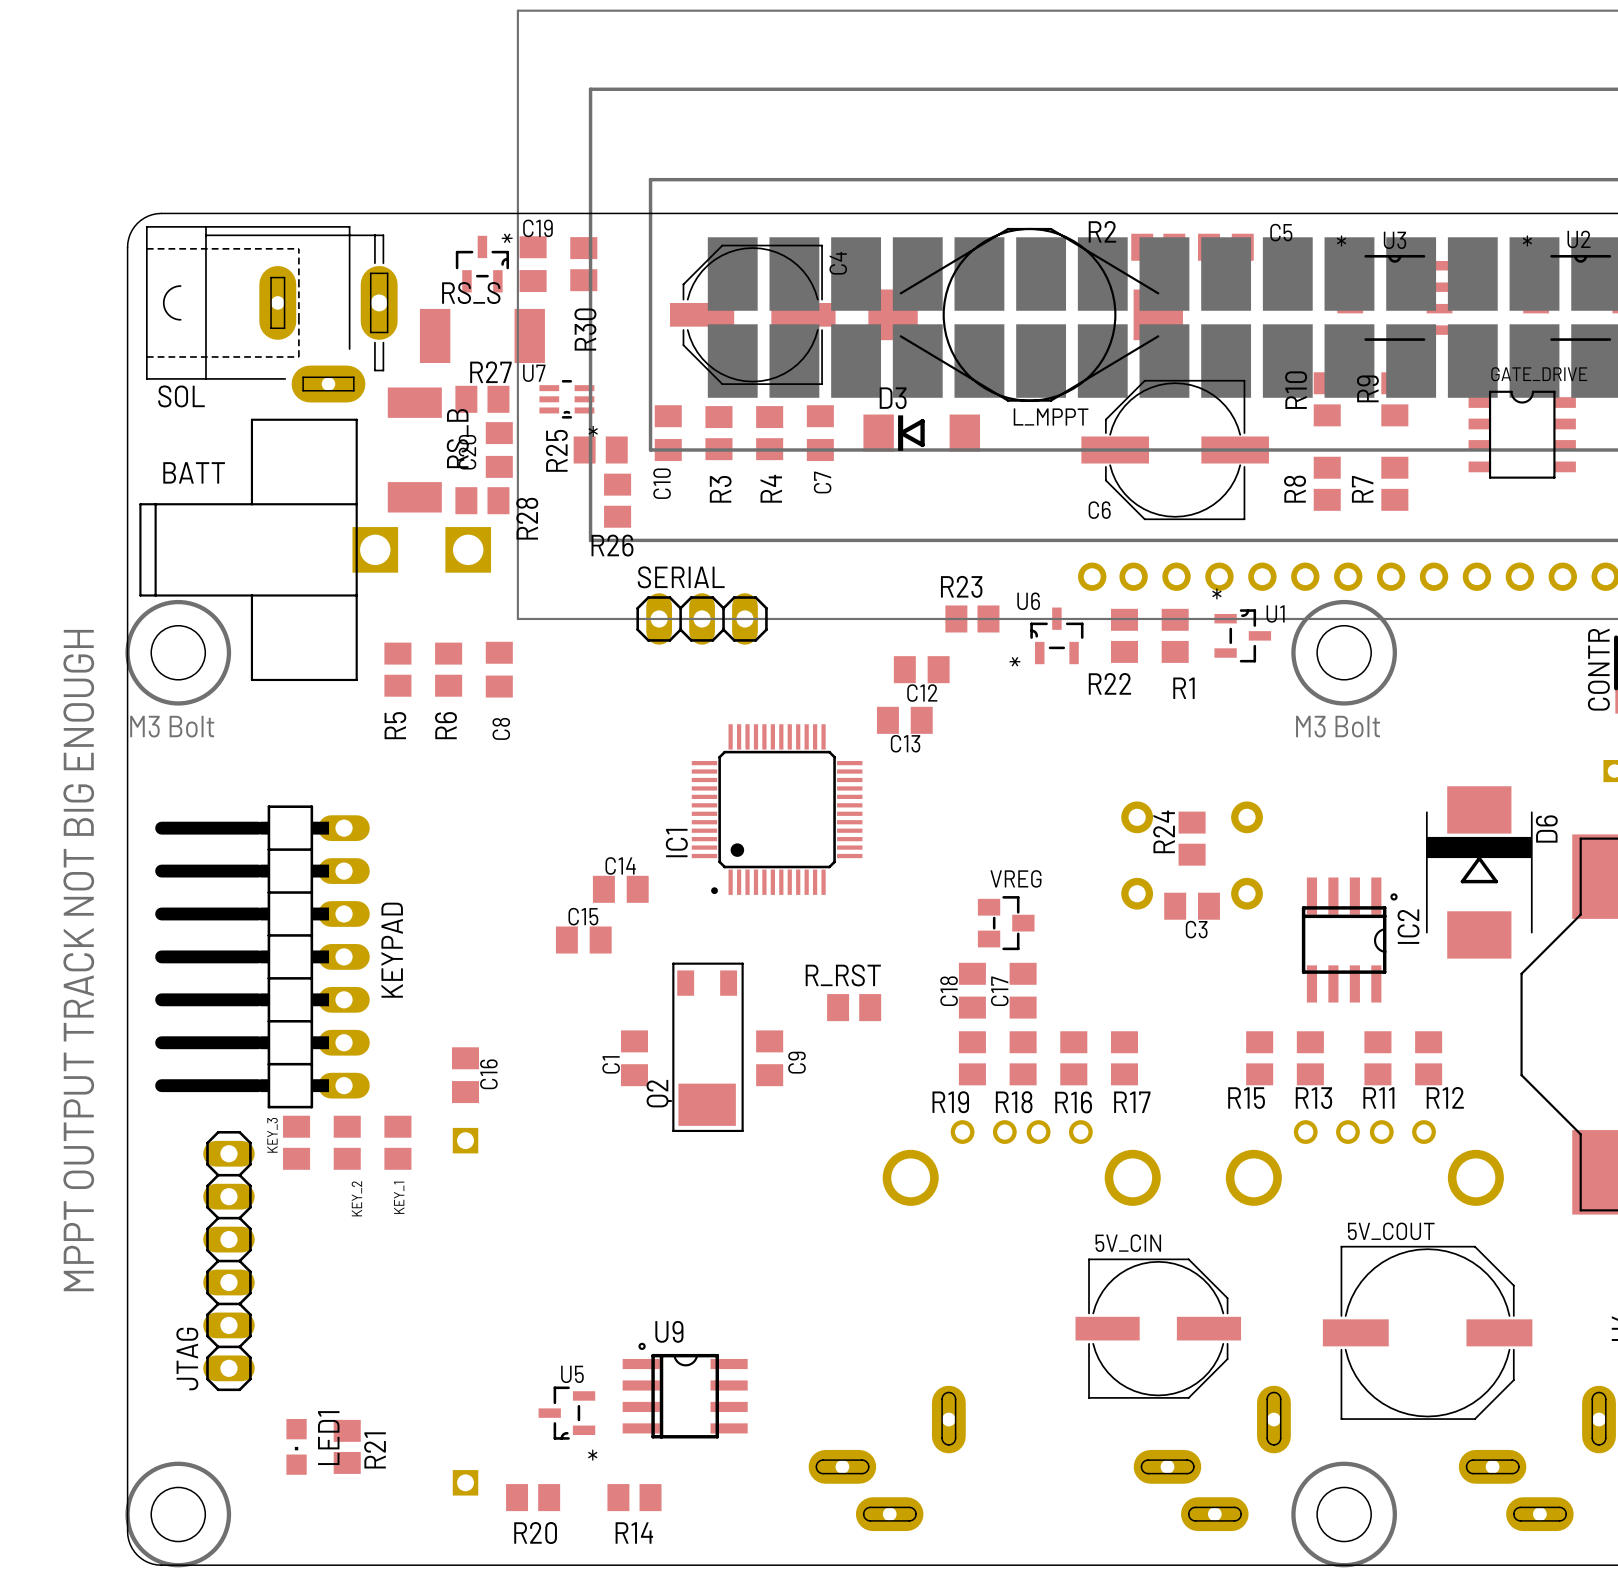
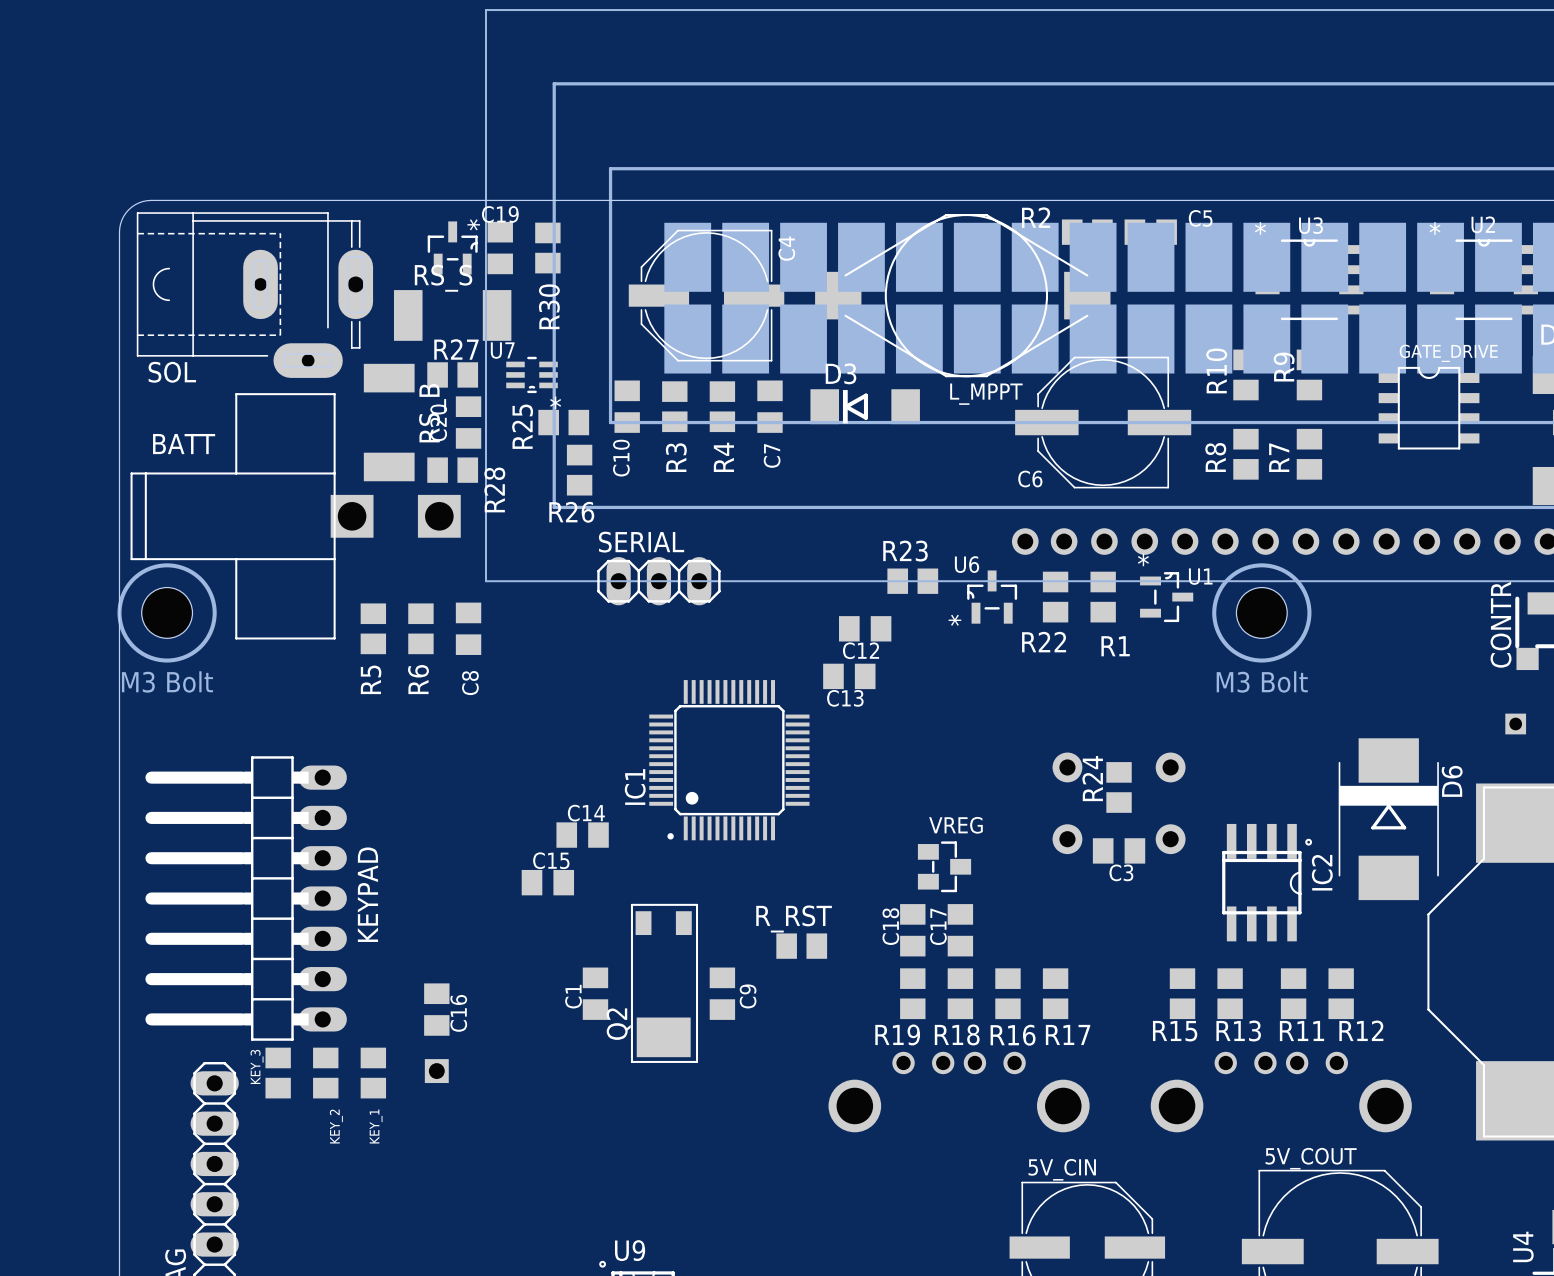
text: MPPT OUTPUT TRACK NOT BIG ENOUGH (78, 960) -> none

